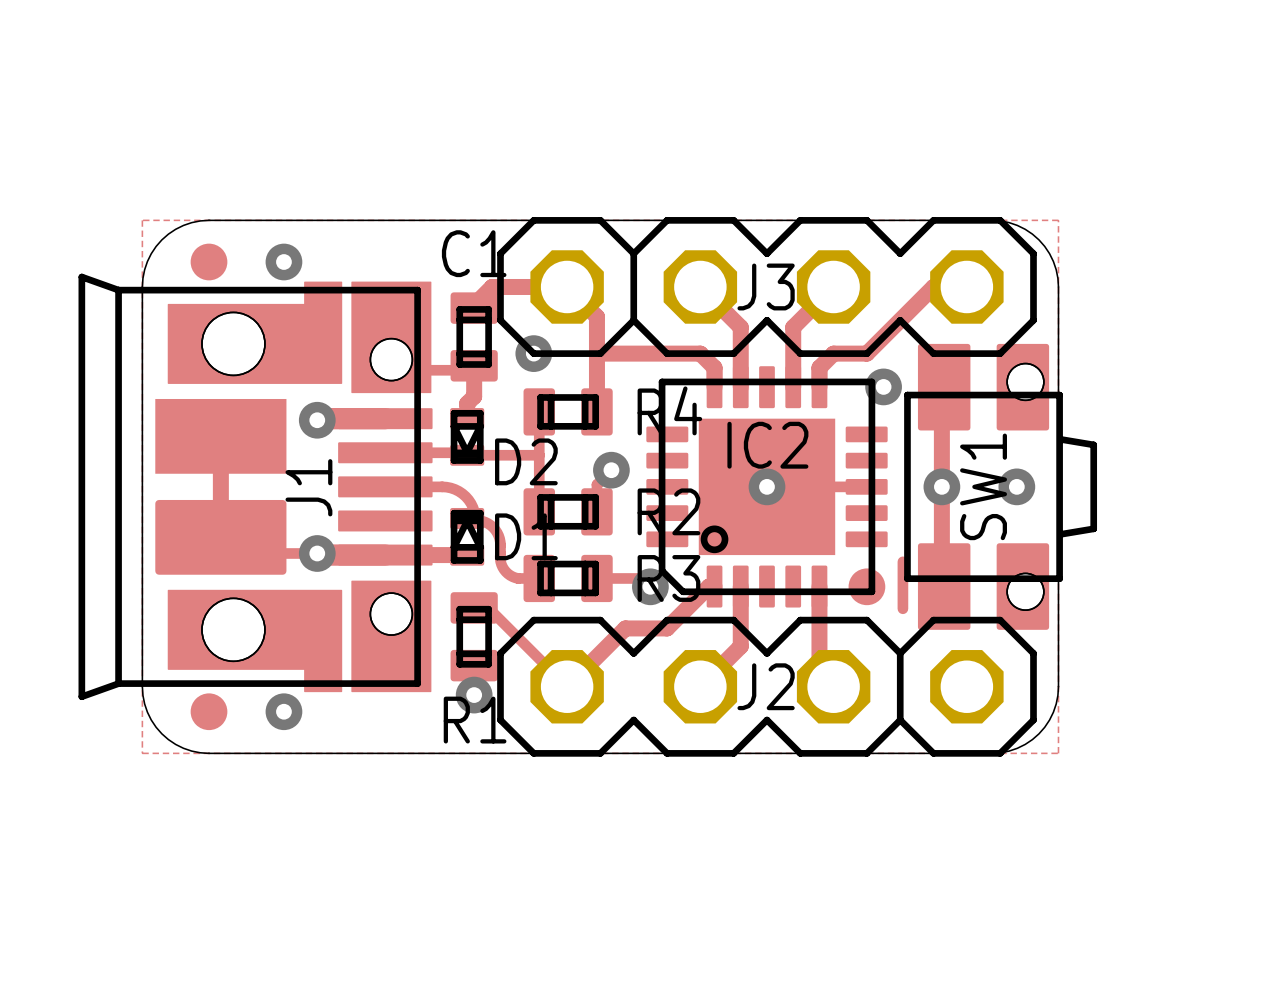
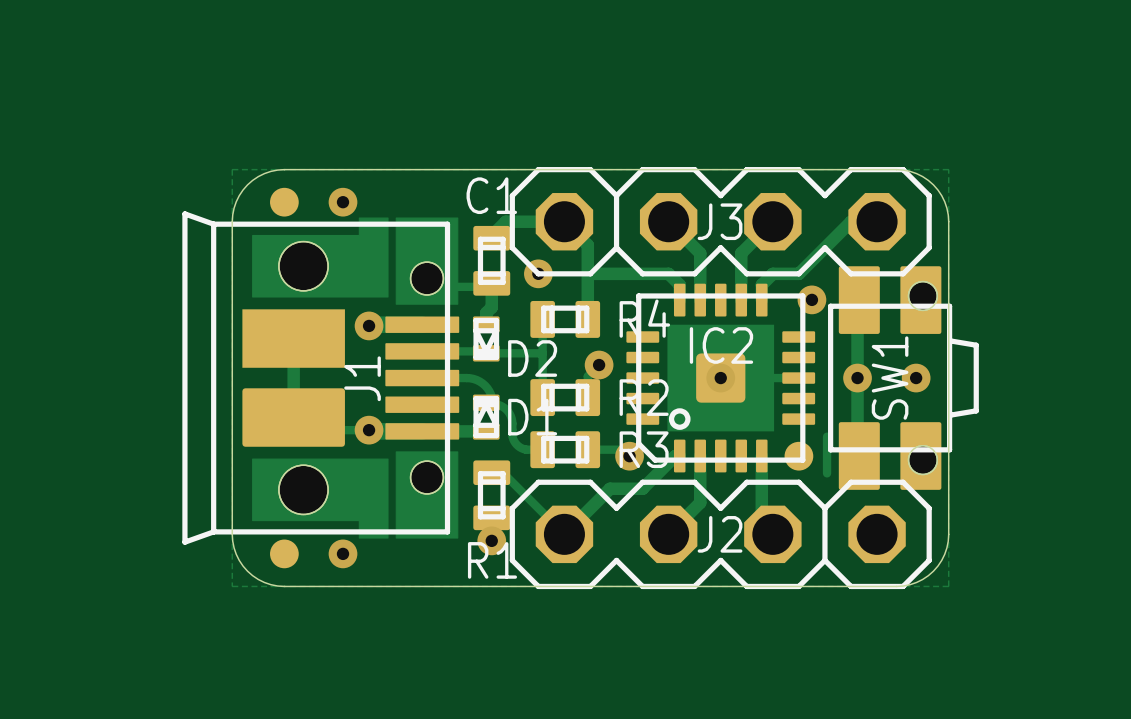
IC2 footprint: [646, 366, 888, 608] -> [626, 283, 816, 473]

